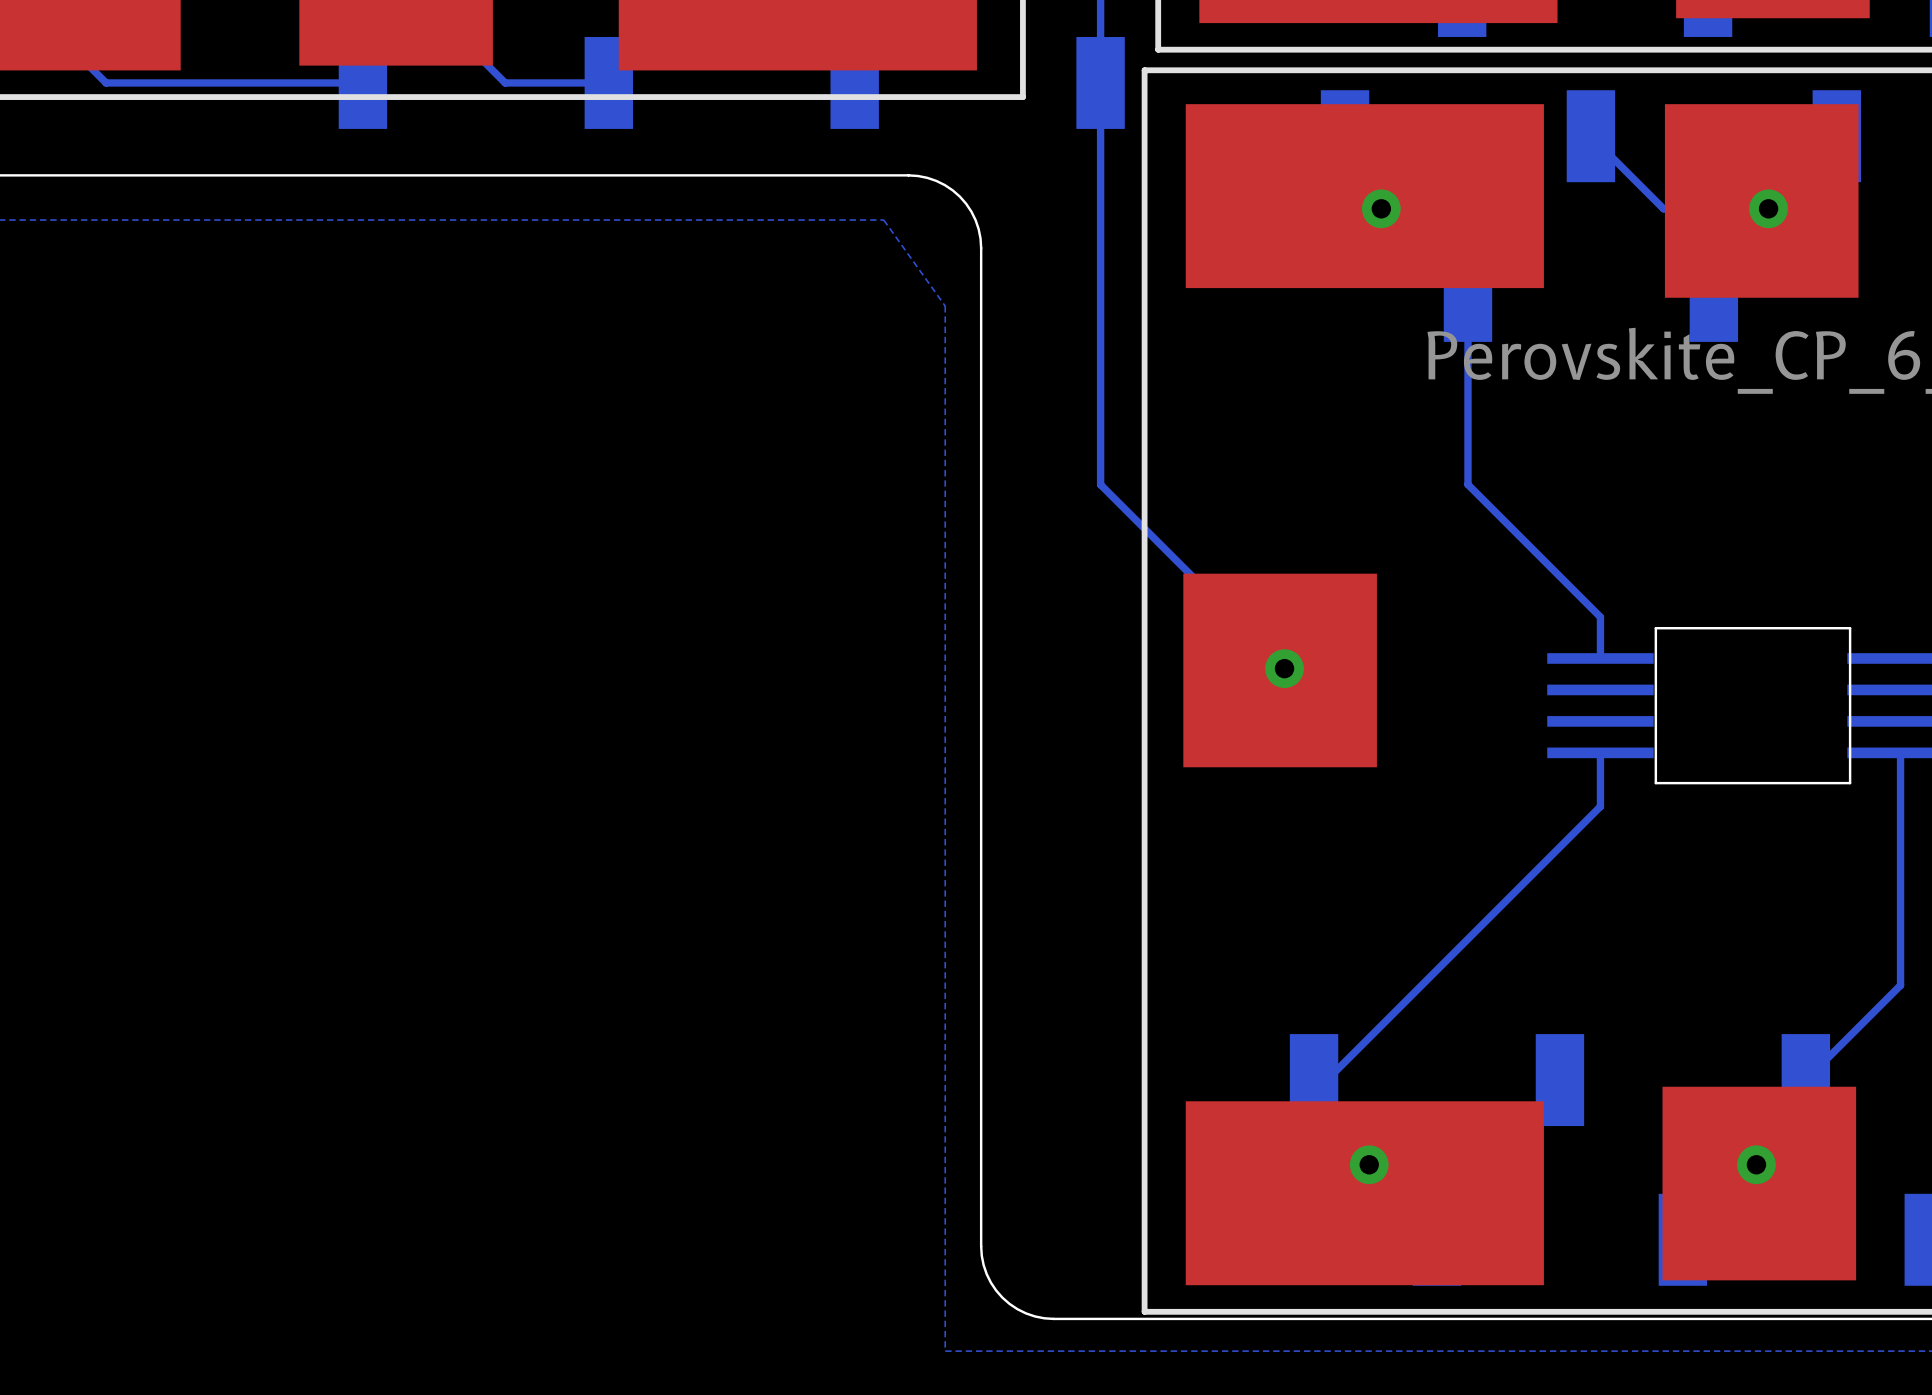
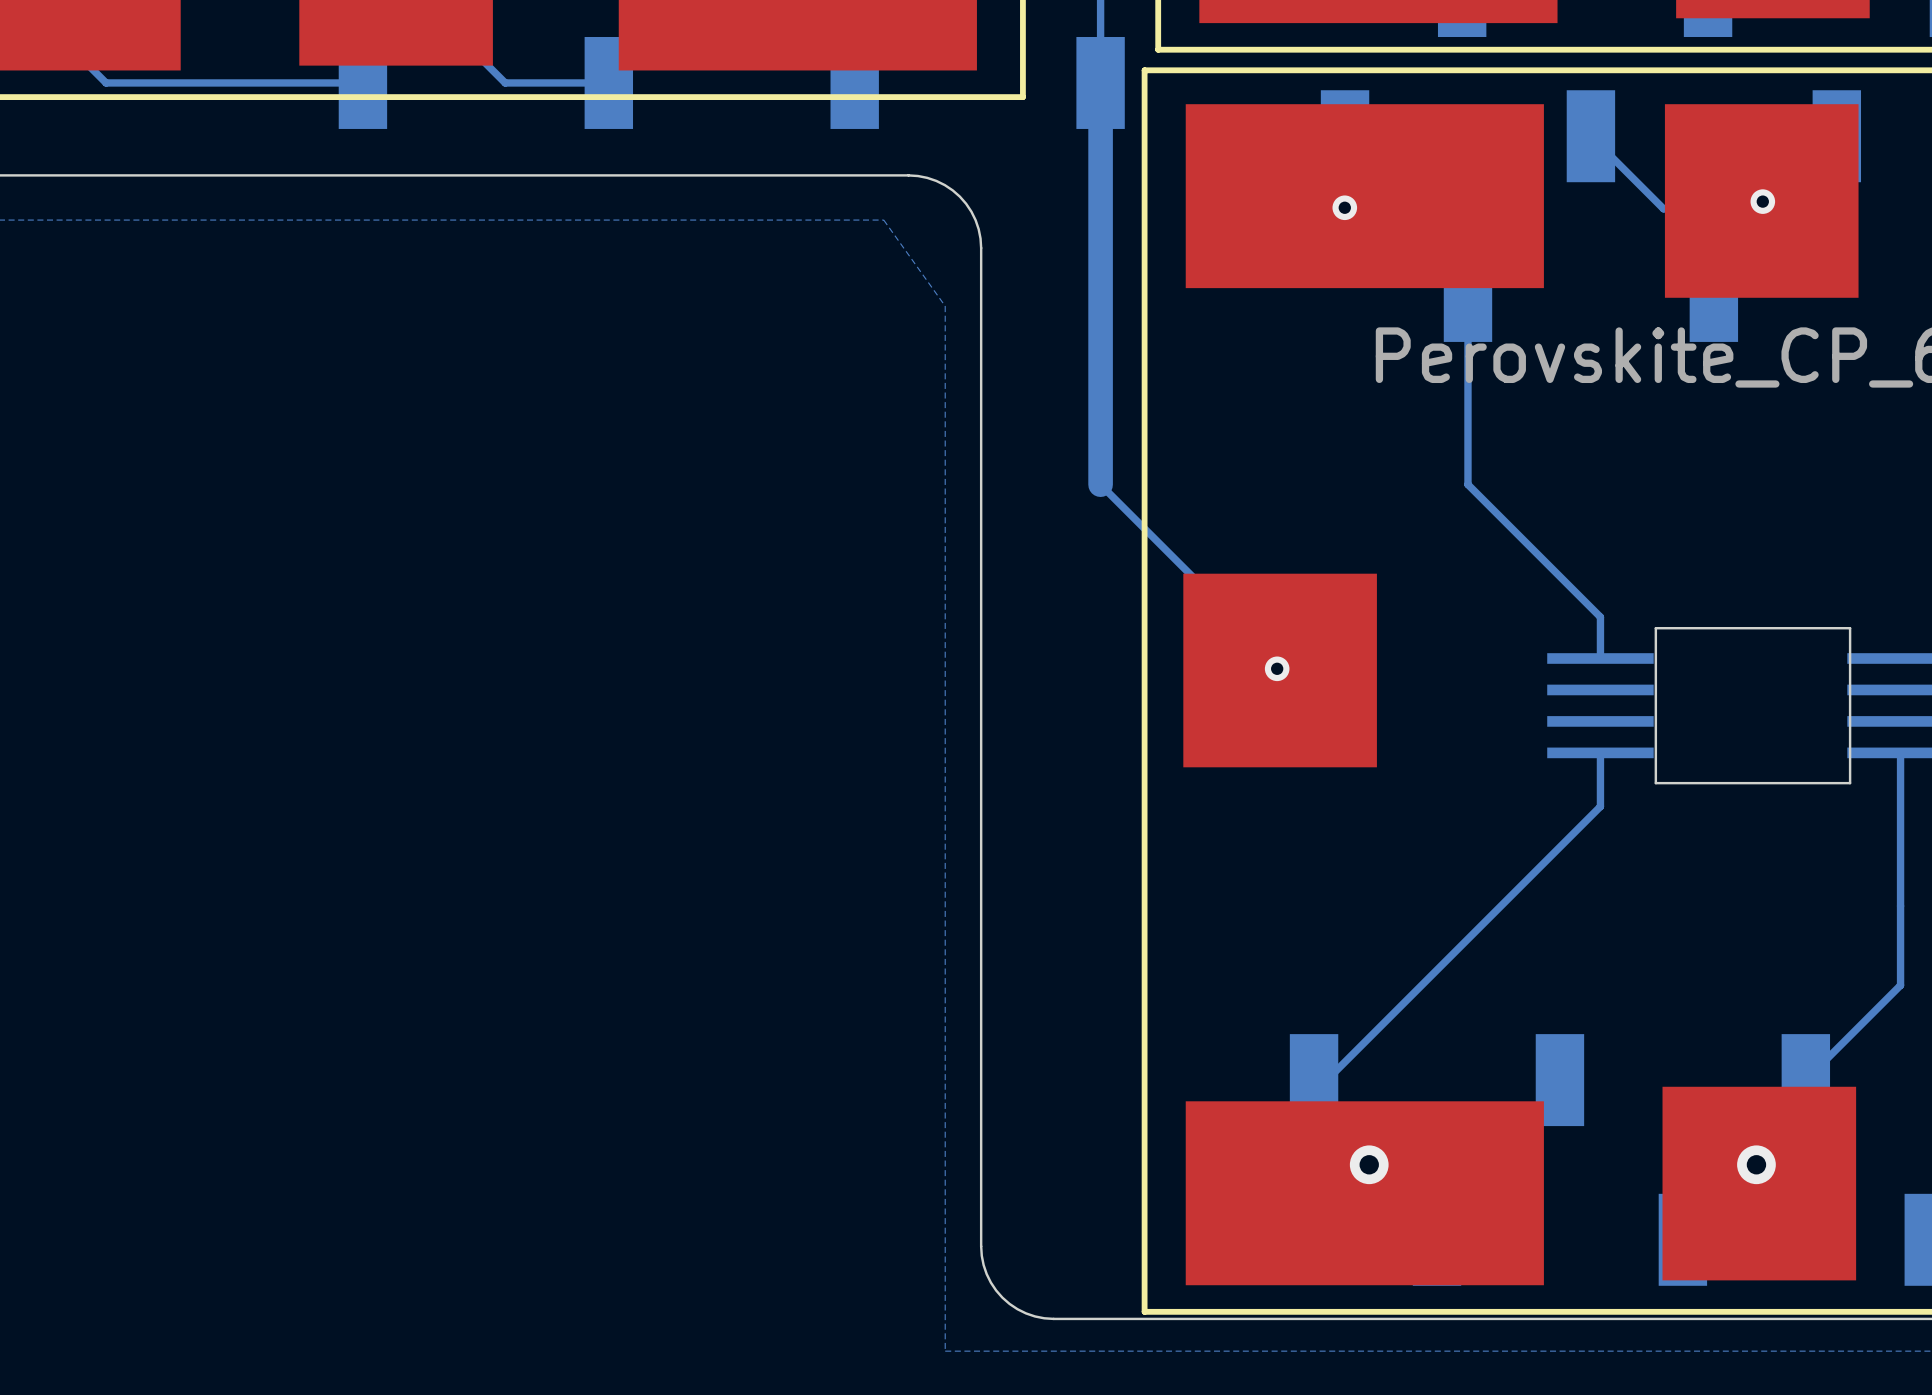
bottom track width: thin (1100, 82) (1100, 484) -> thick (1100, 82) (1100, 484)
via size: [1749, 189, 1788, 229] -> [1750, 189, 1776, 214]
via: none -> (1344, 207)
via: (1381, 208) -> none
via size: [1265, 649, 1304, 689] -> [1264, 656, 1290, 682]

